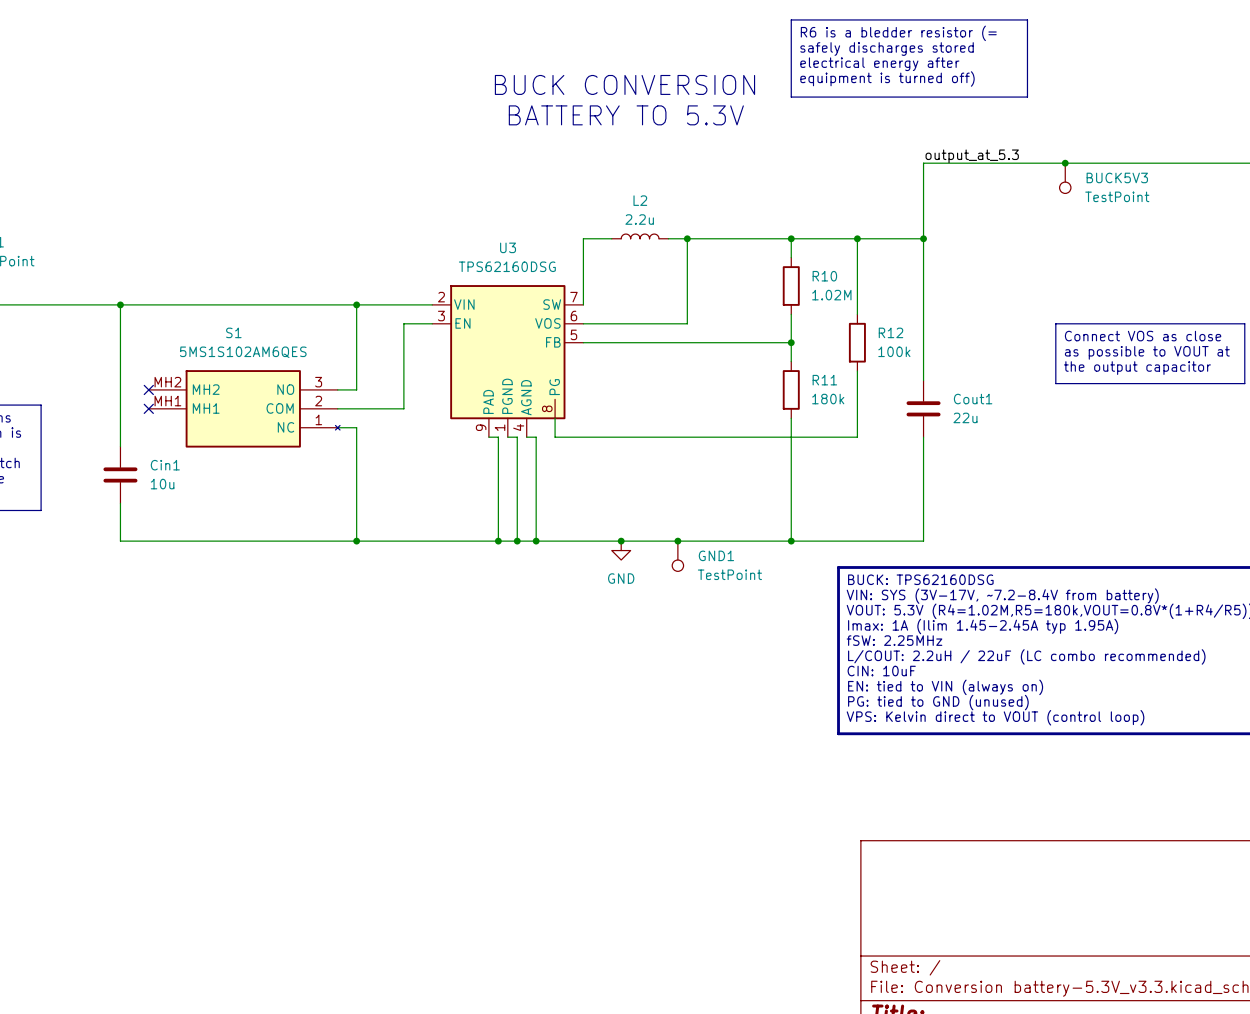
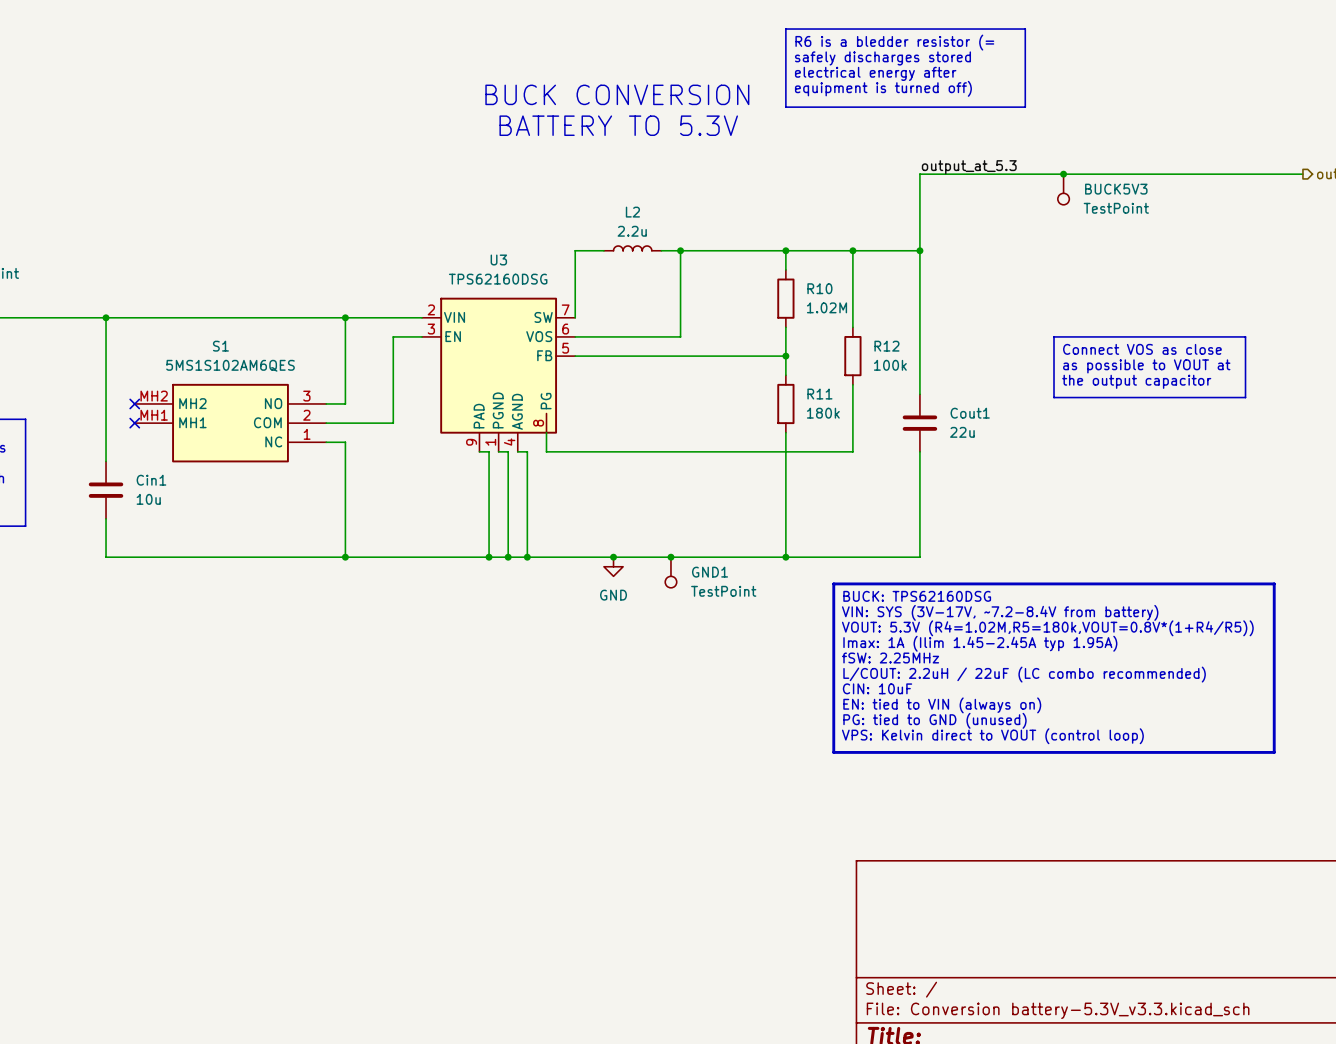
S1 symbol: [148, 370, 340, 448] -> [134, 383, 327, 463]

